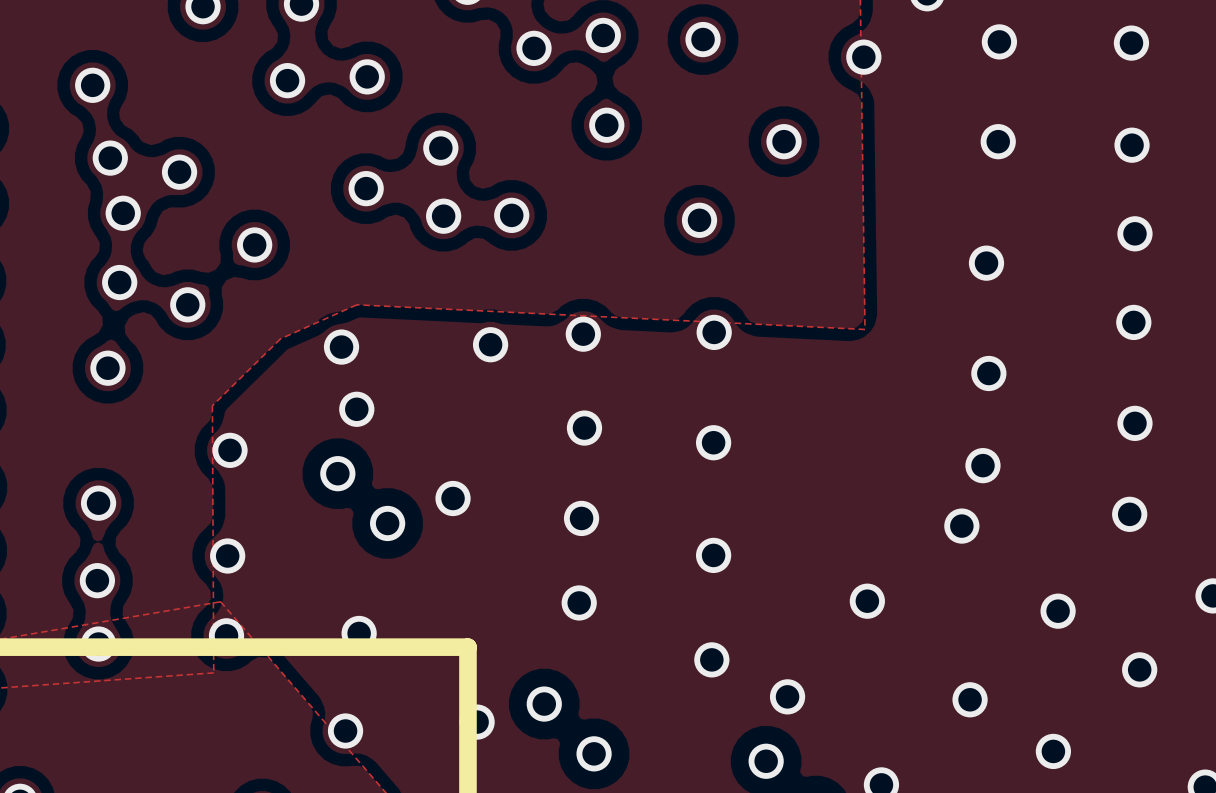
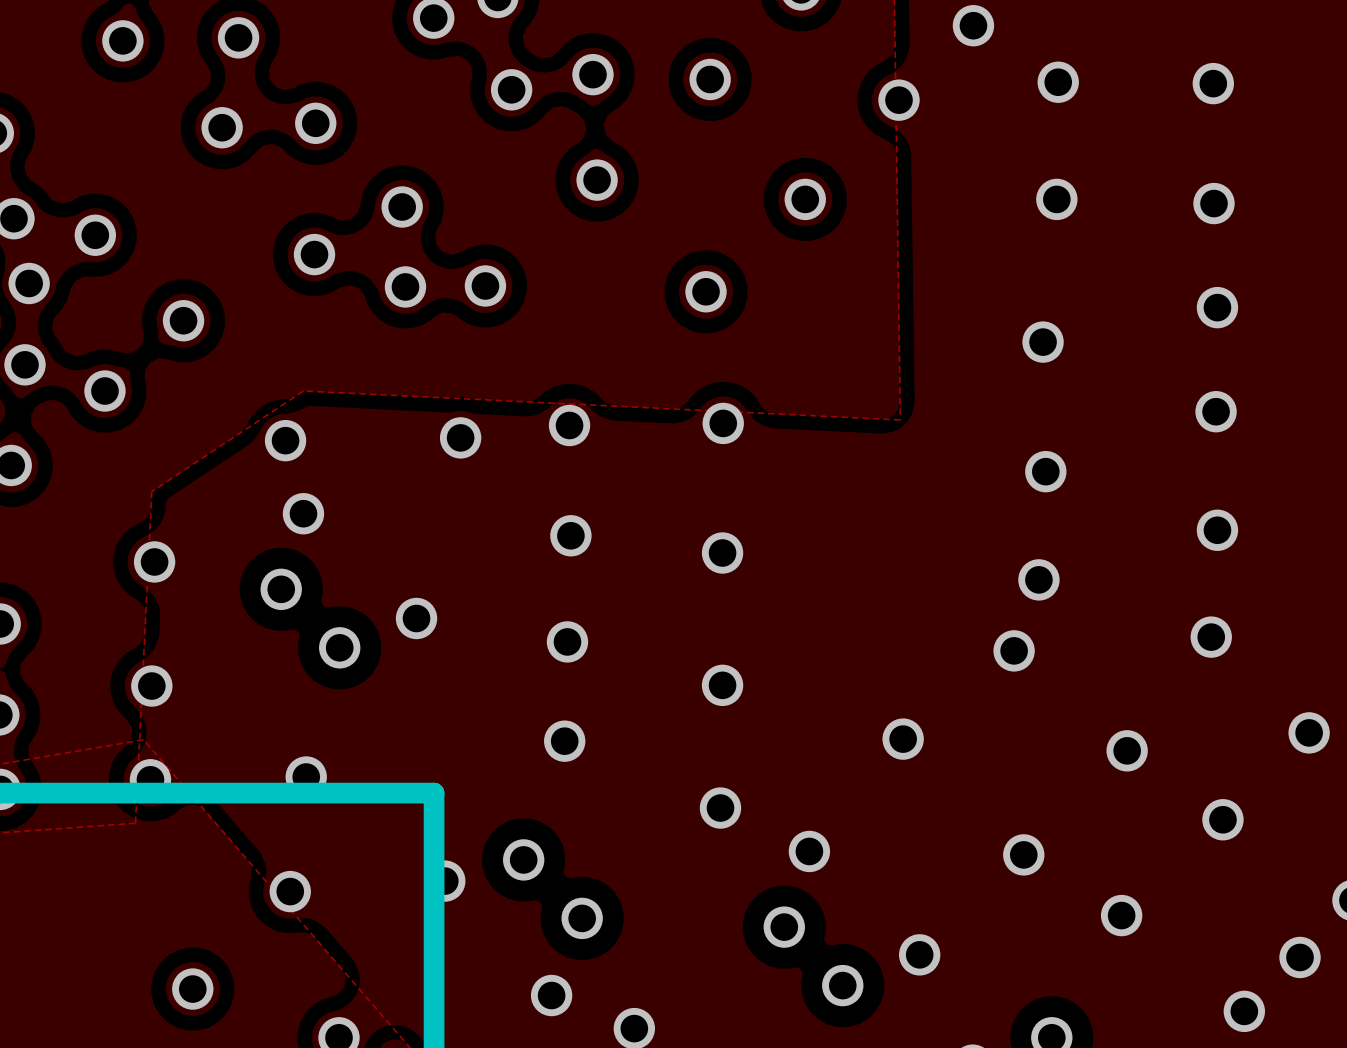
zone outline: (356, 304) (280, 338) (212, 405) (213, 672) -> (303, 391) (151, 491) (135, 823)

